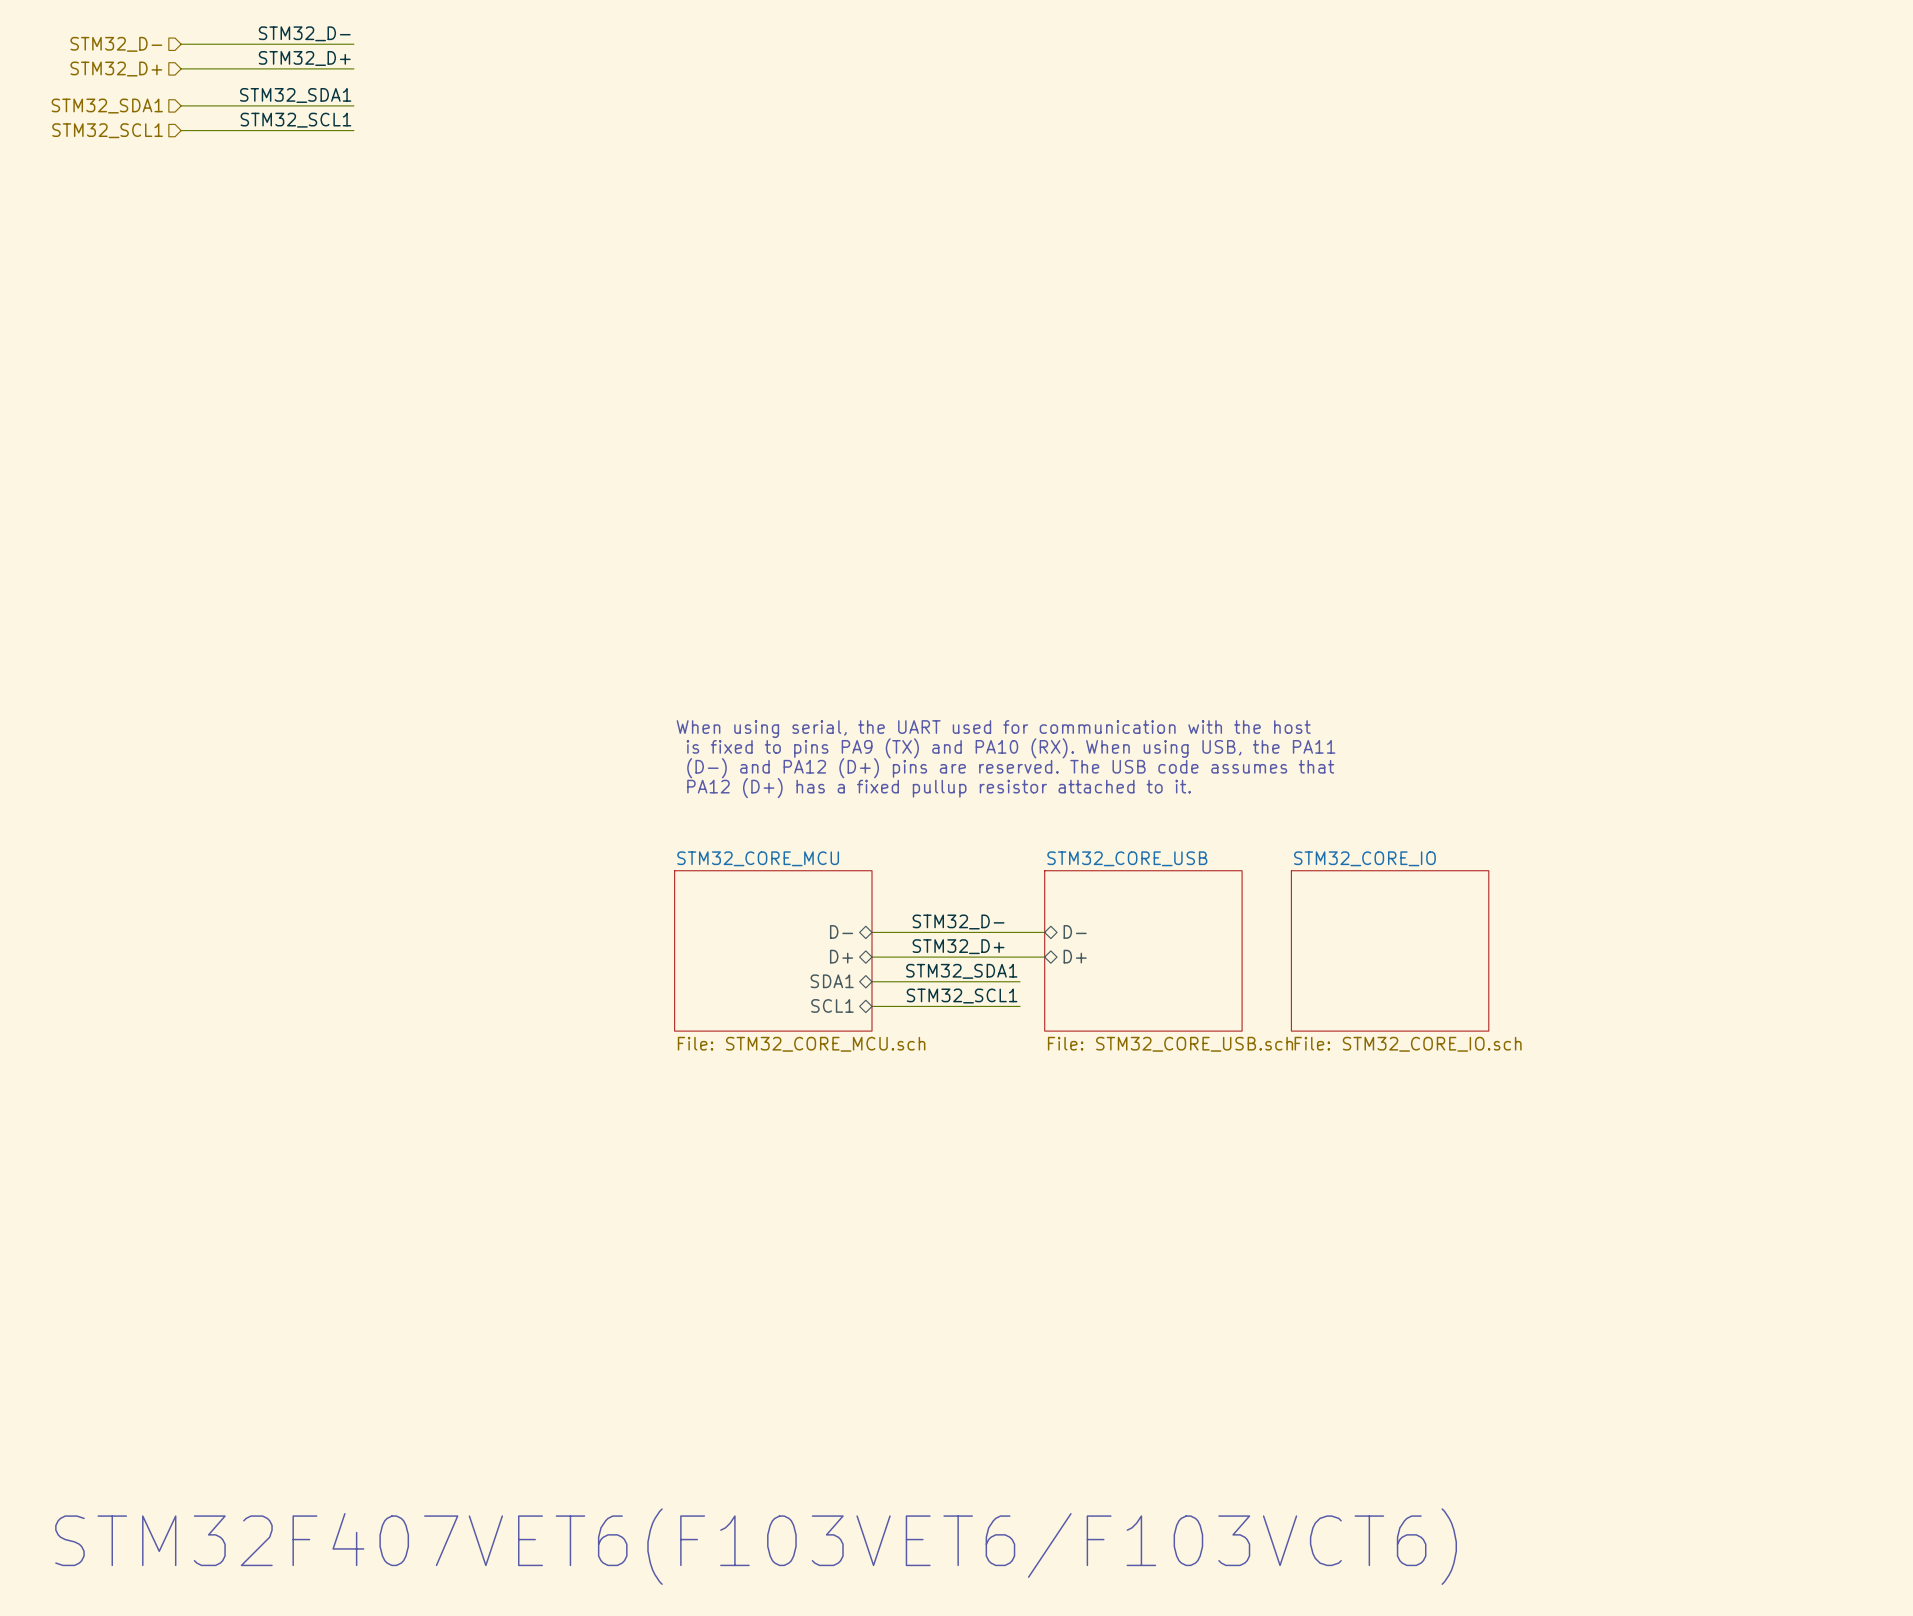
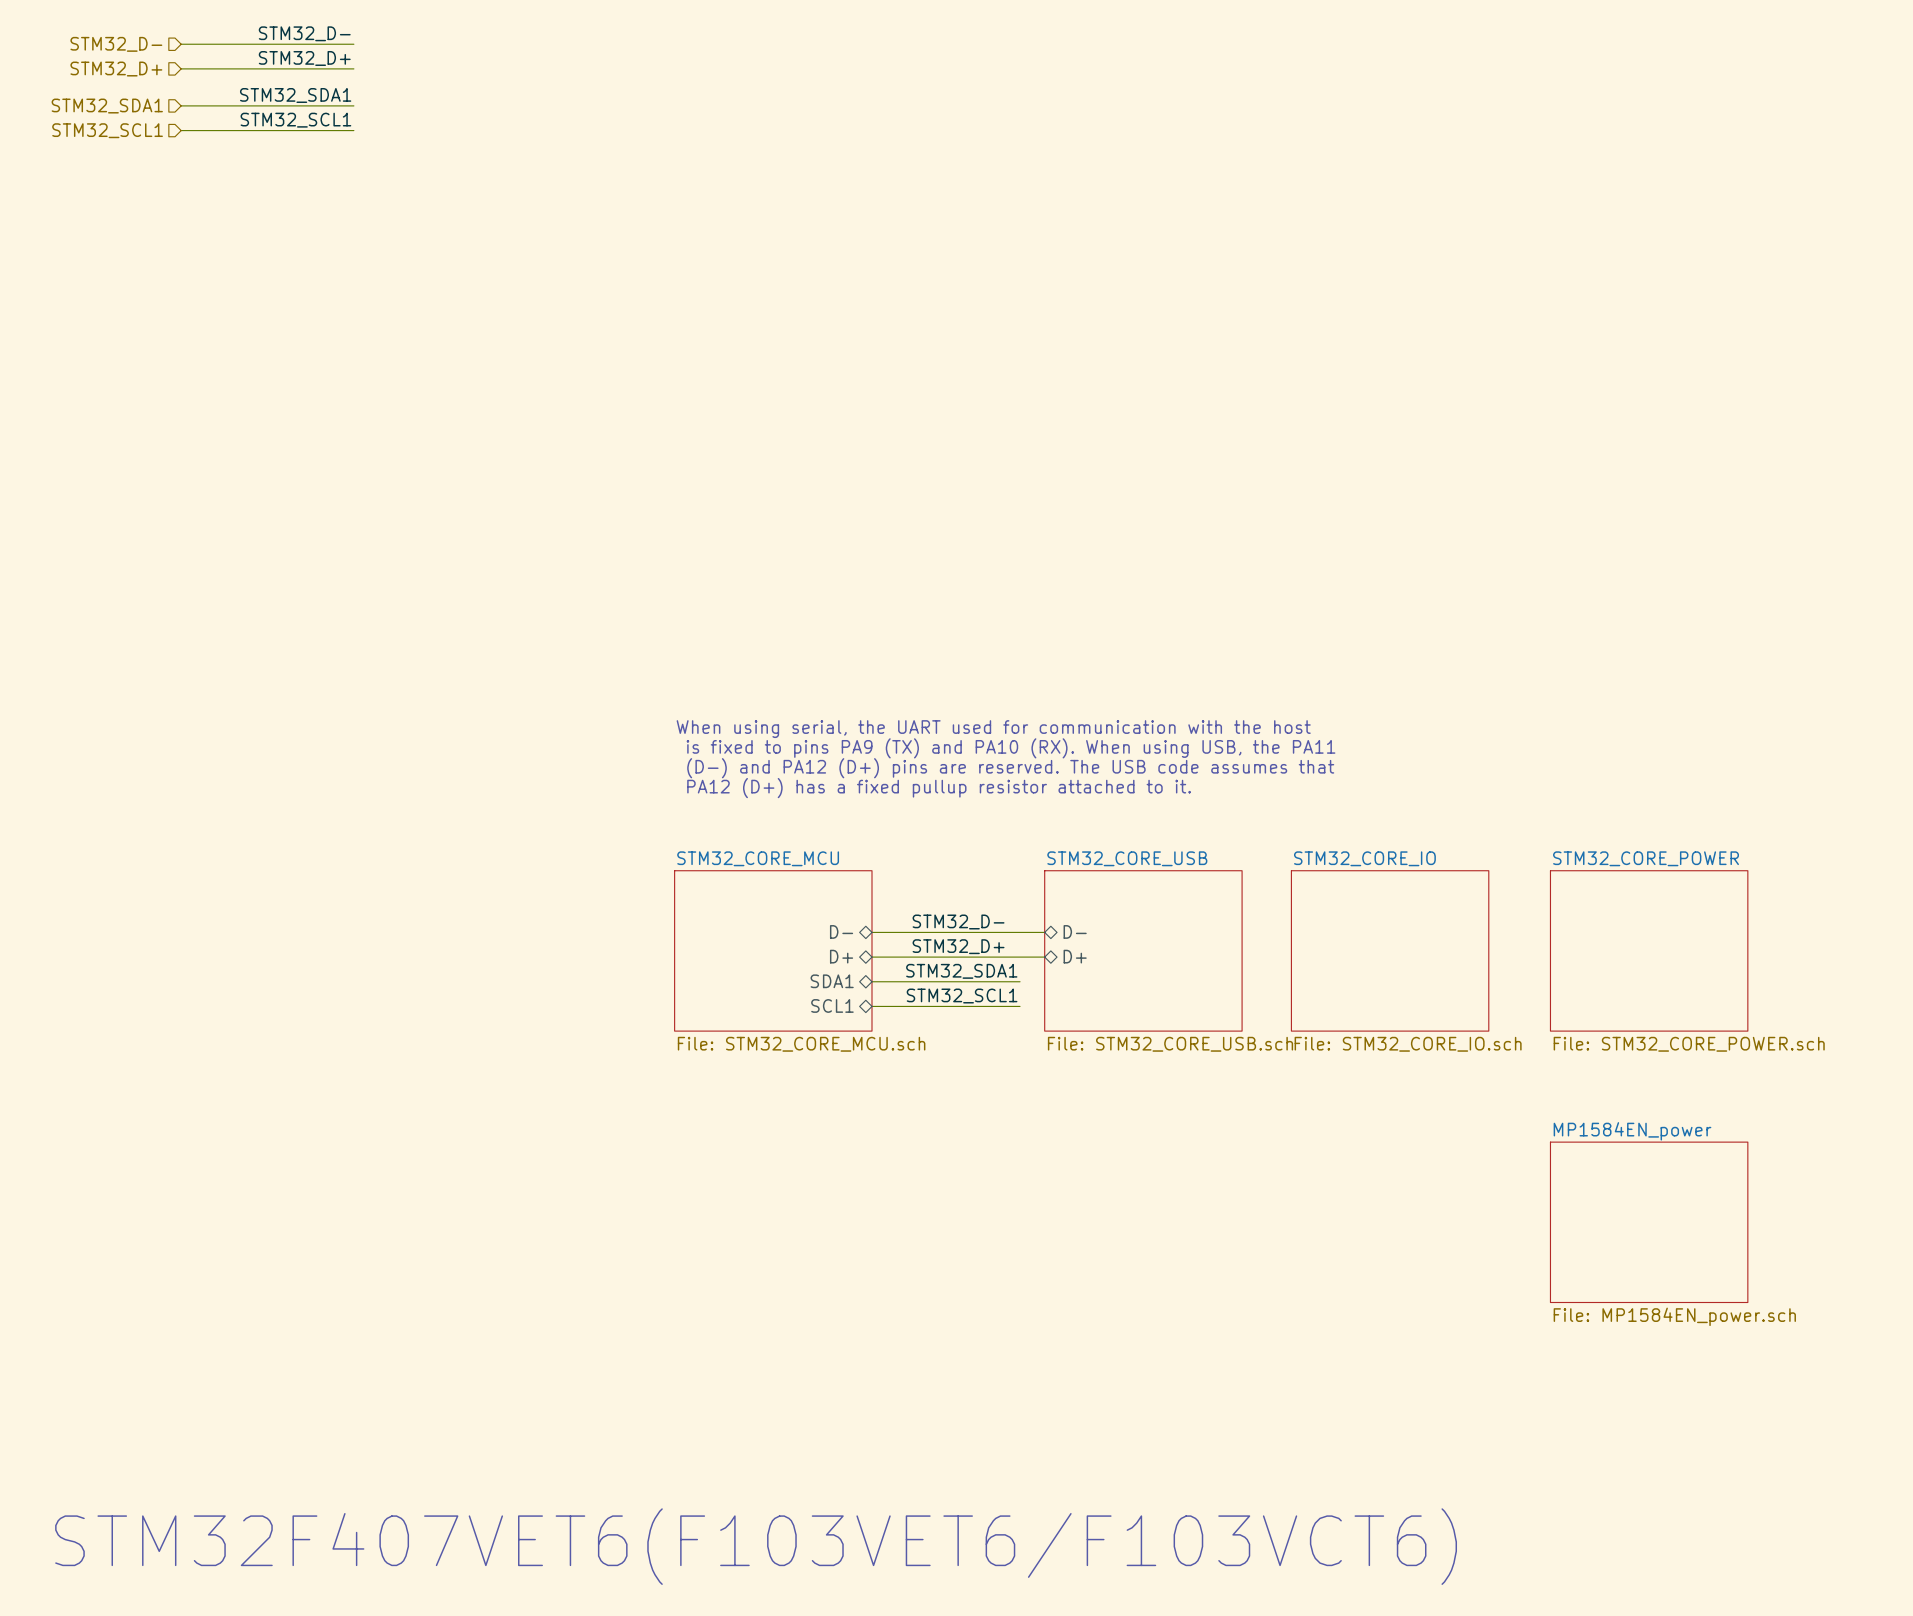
sheet STM32_CORE_POWER: none -> File: STM32_CORE_POWER.sch (1649, 950)
sheet MP1584EN_power: none -> File: MP1584EN_power.sch (1649, 1222)

